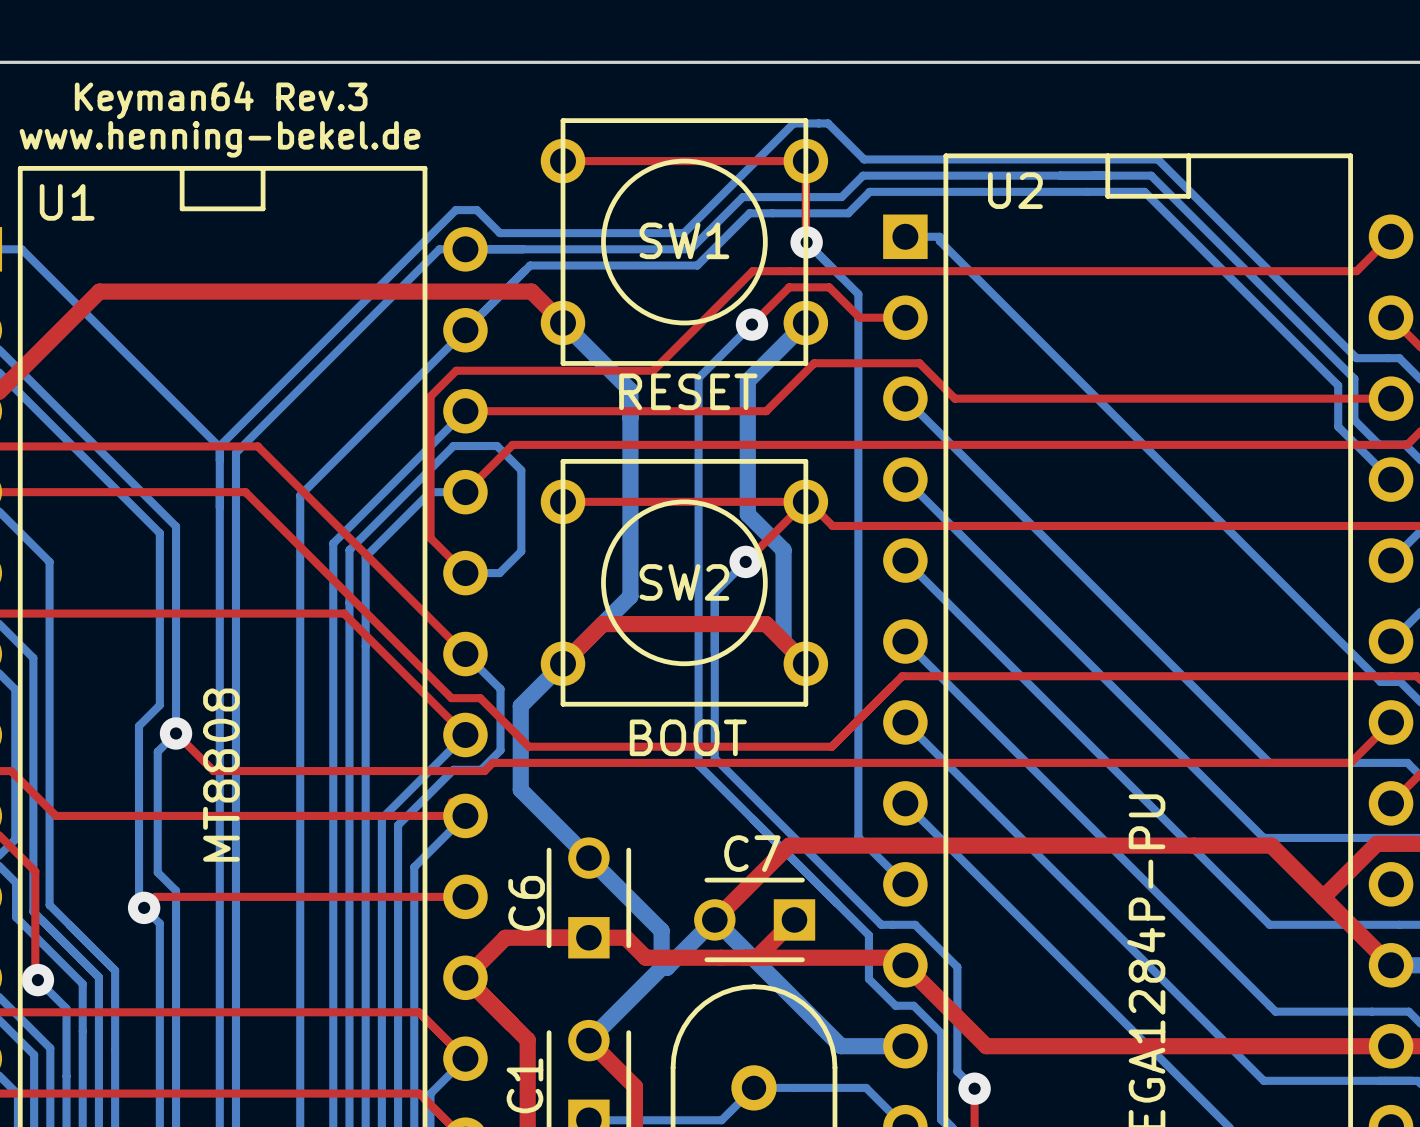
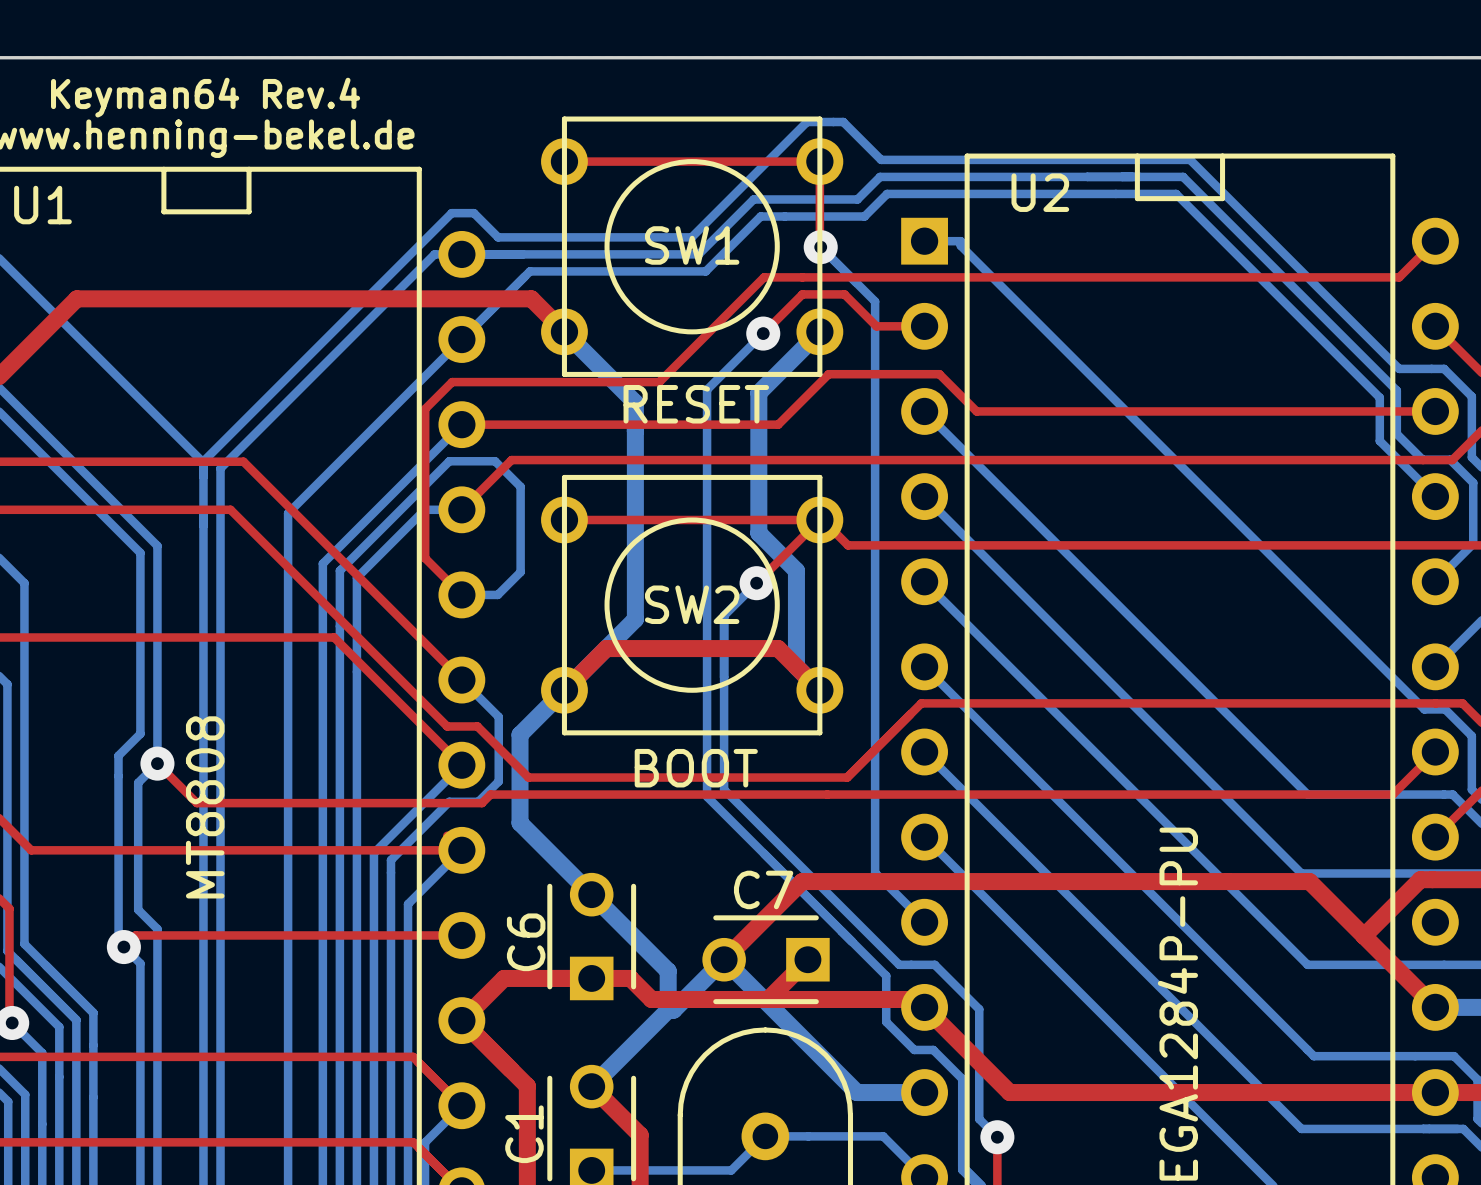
text: Keyman64 Rev.3 (221, 100) -> Keyman64 Rev.4 (205, 97)

